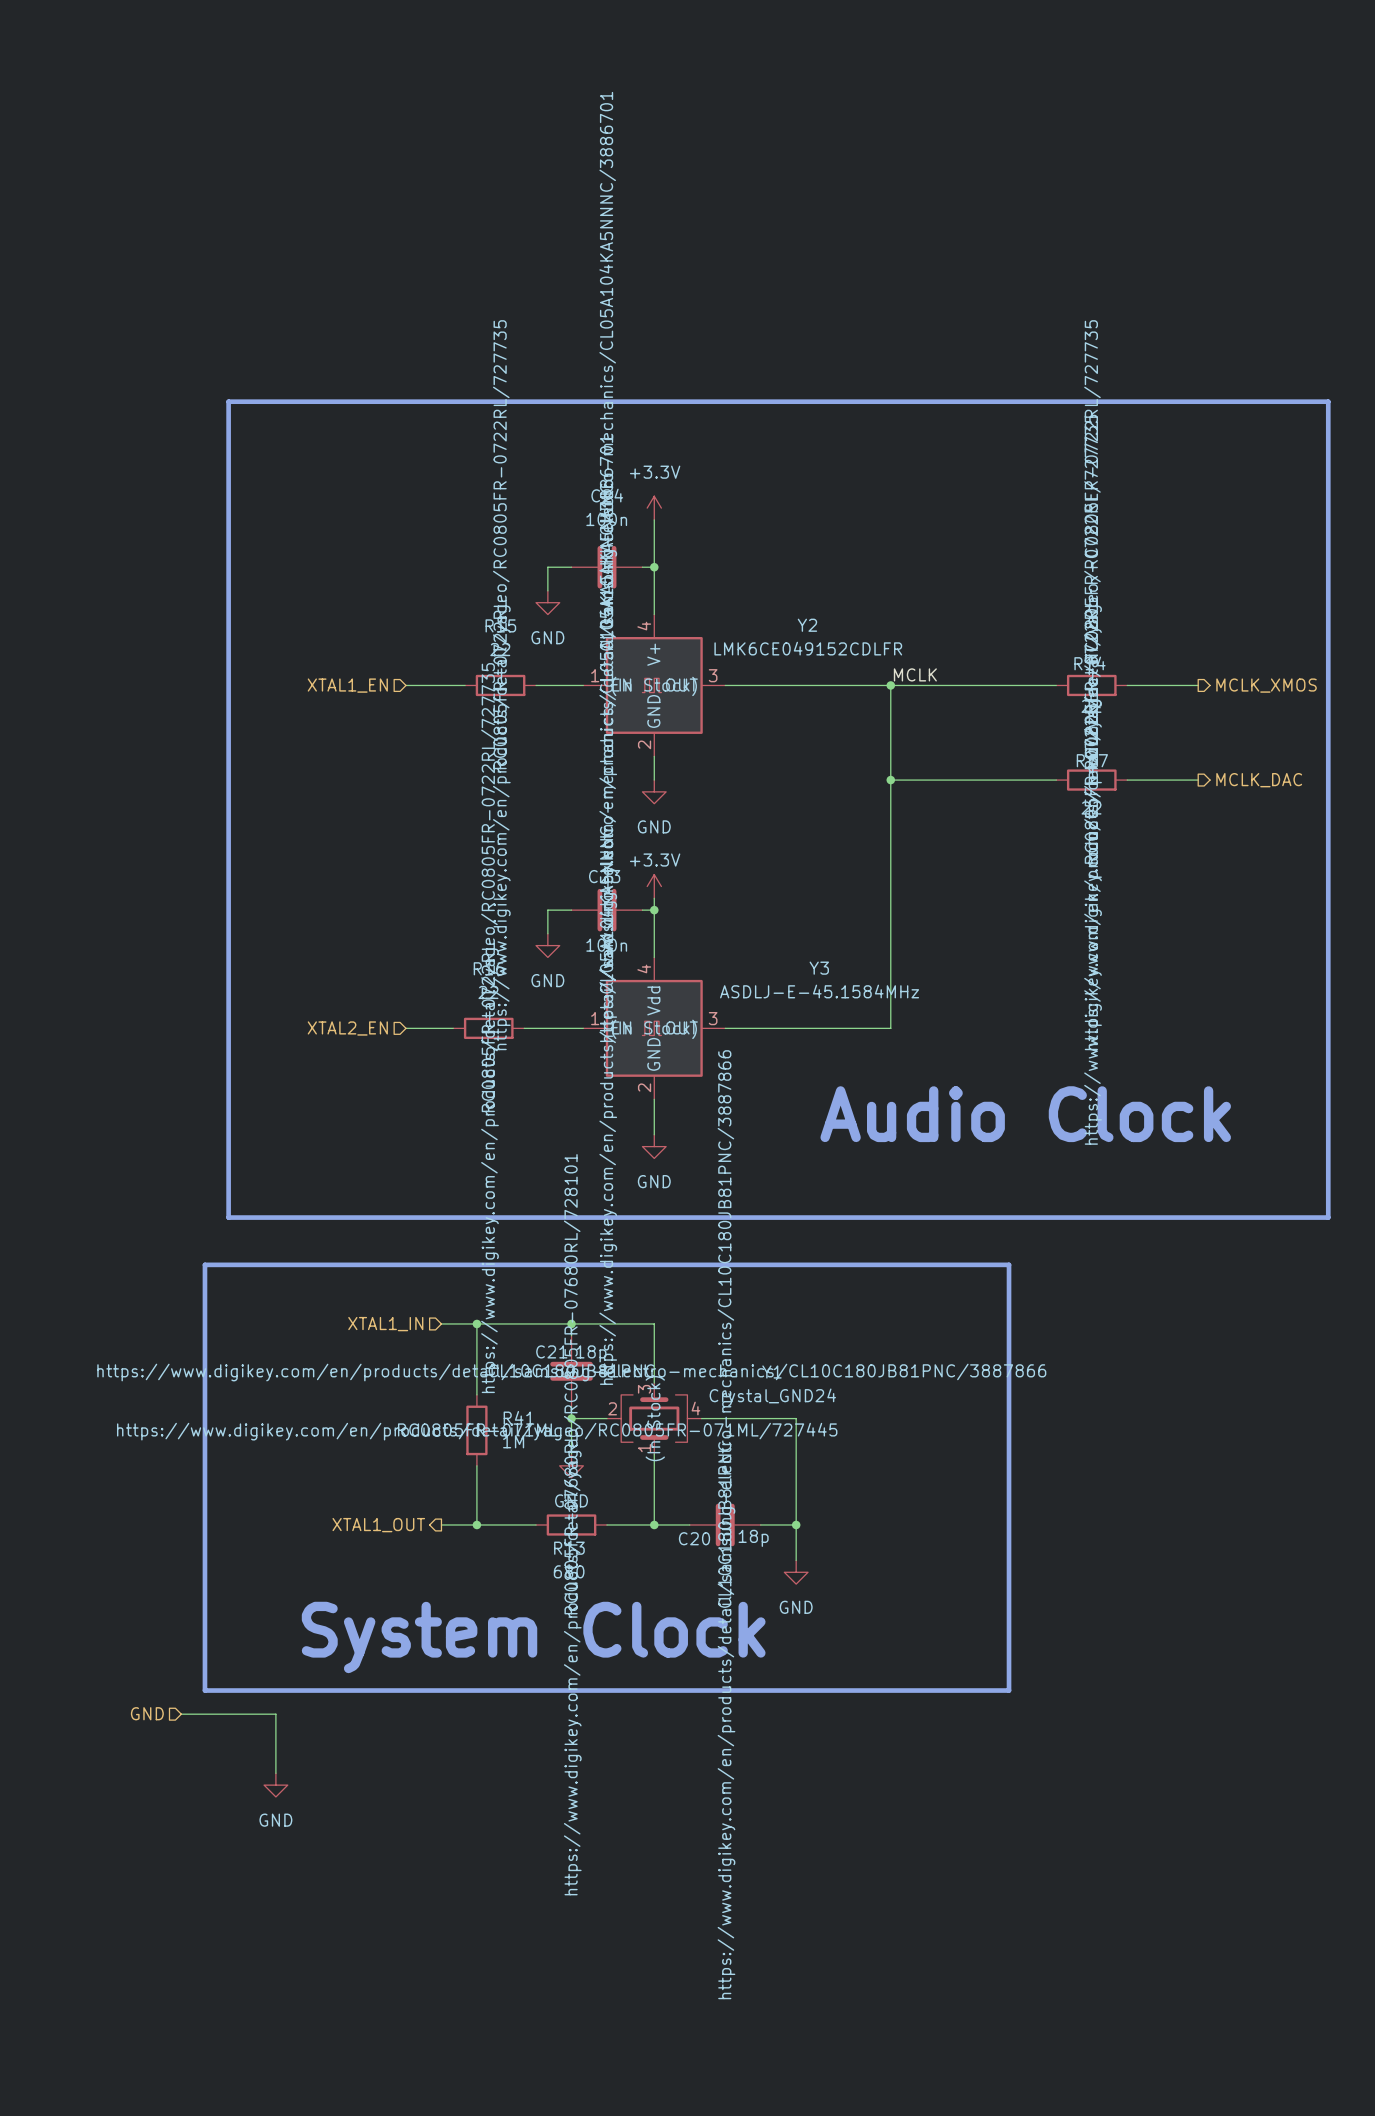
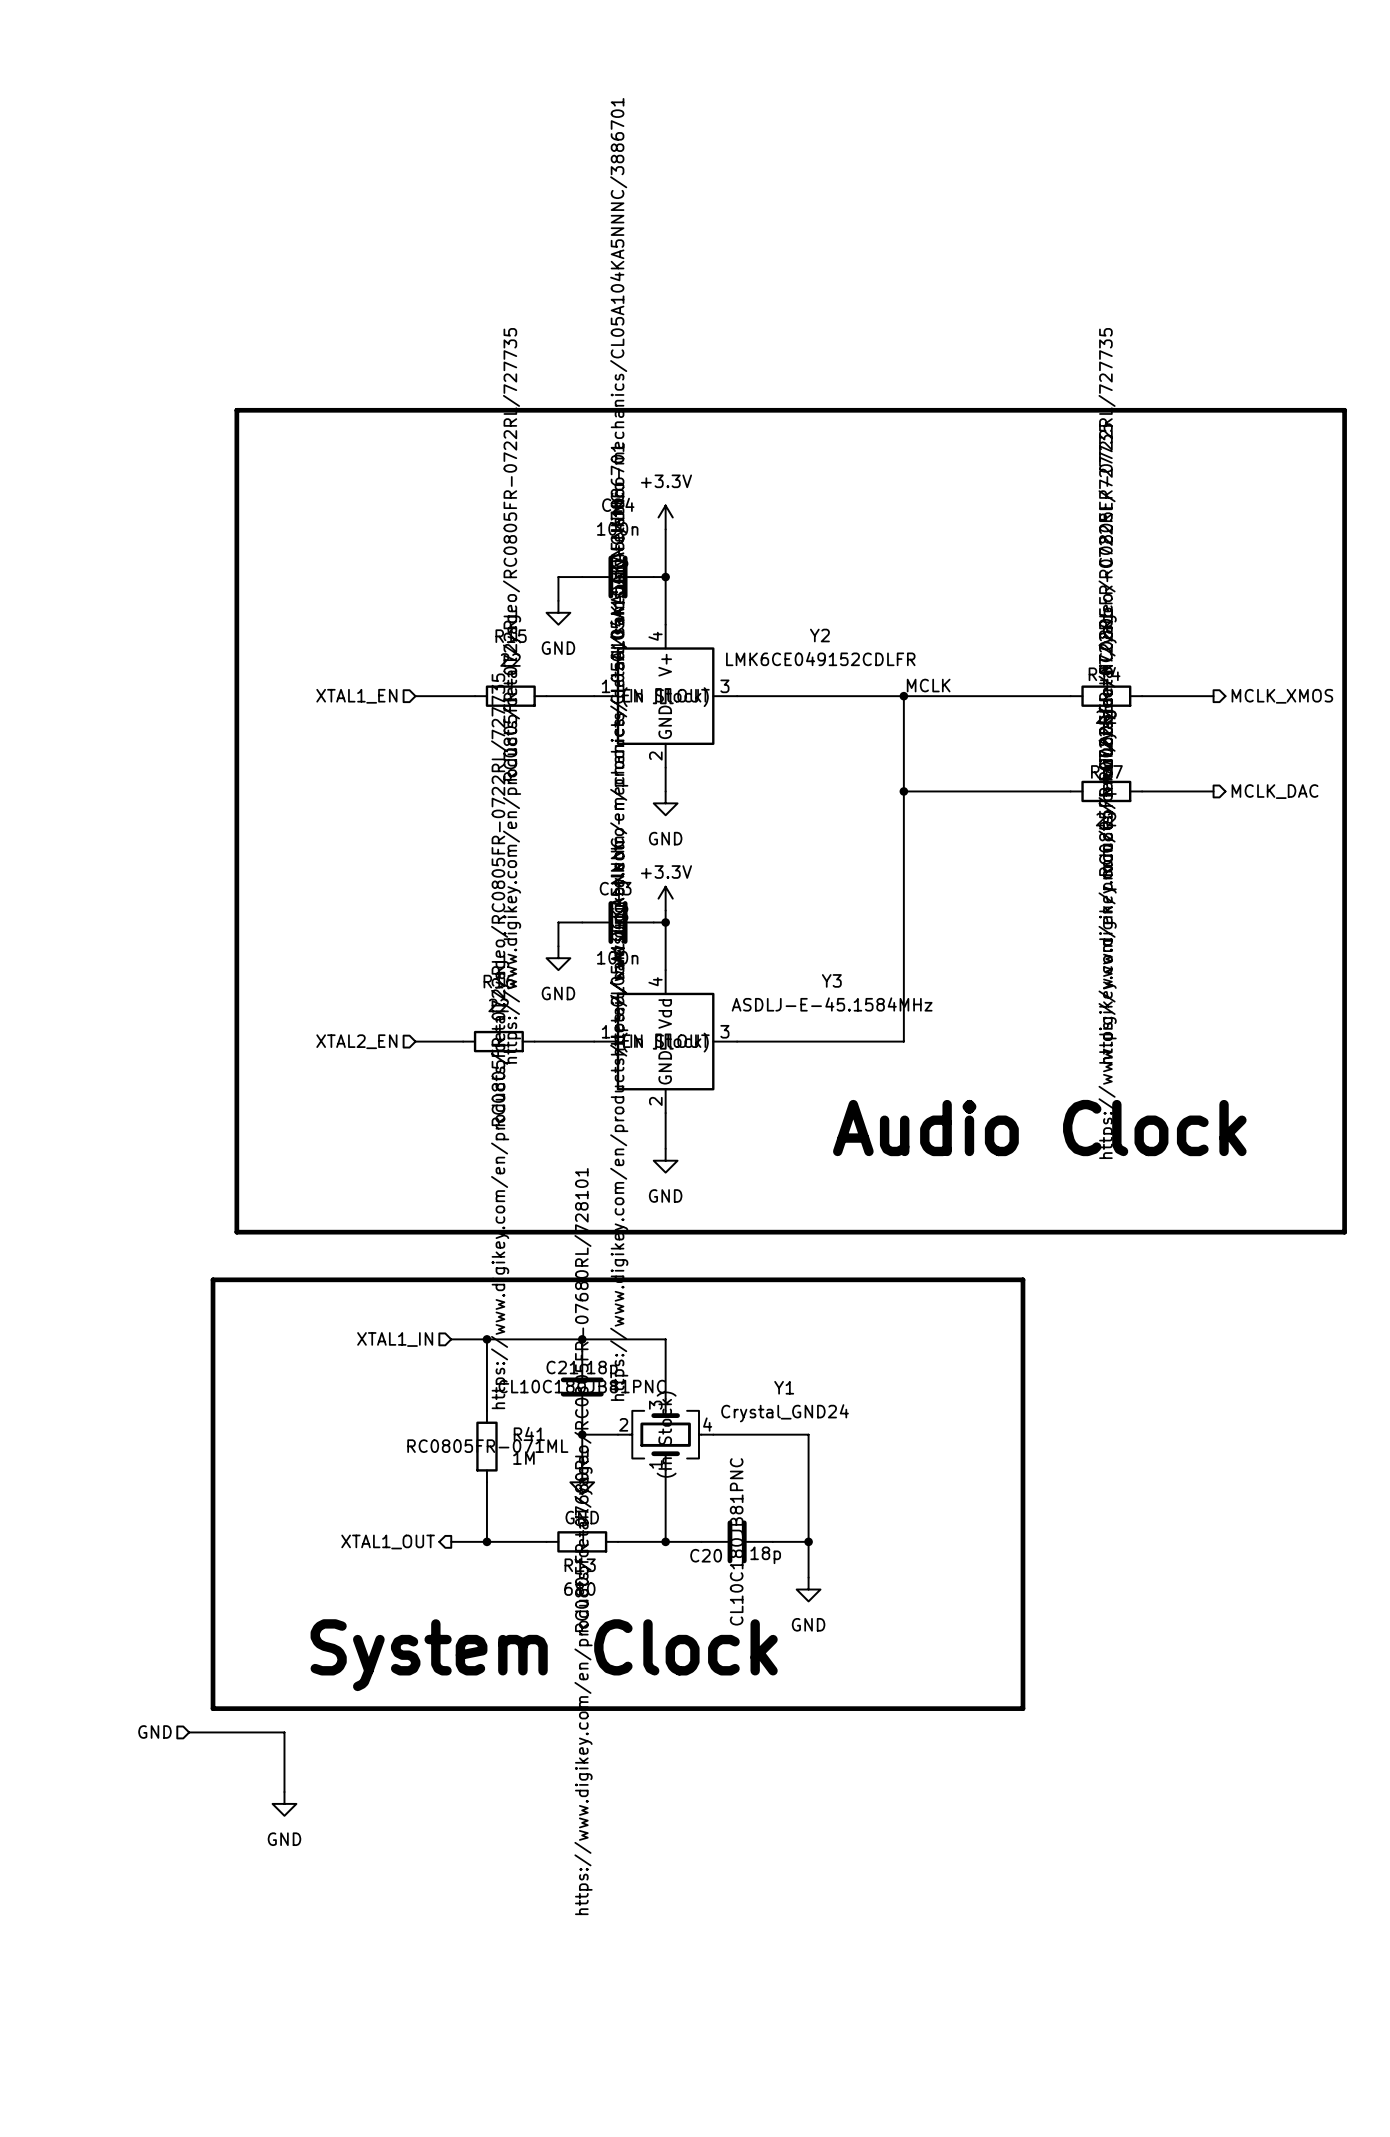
C21 text: https://www.digikey.com/en/products/detail/samsung-electro-mechanics/CL10C180JB81PNC/3887866 (571, 1372) -> none
R41 text: https://www.digikey.com/en/products/detail/yageo/RC0805FR-071ML/727445 (477, 1431) -> none
C20 text: https://www.digikey.com/en/products/detail/samsung-electro-mechanics/CL10C180JB81PNC/3887866 (726, 1524) -> none

